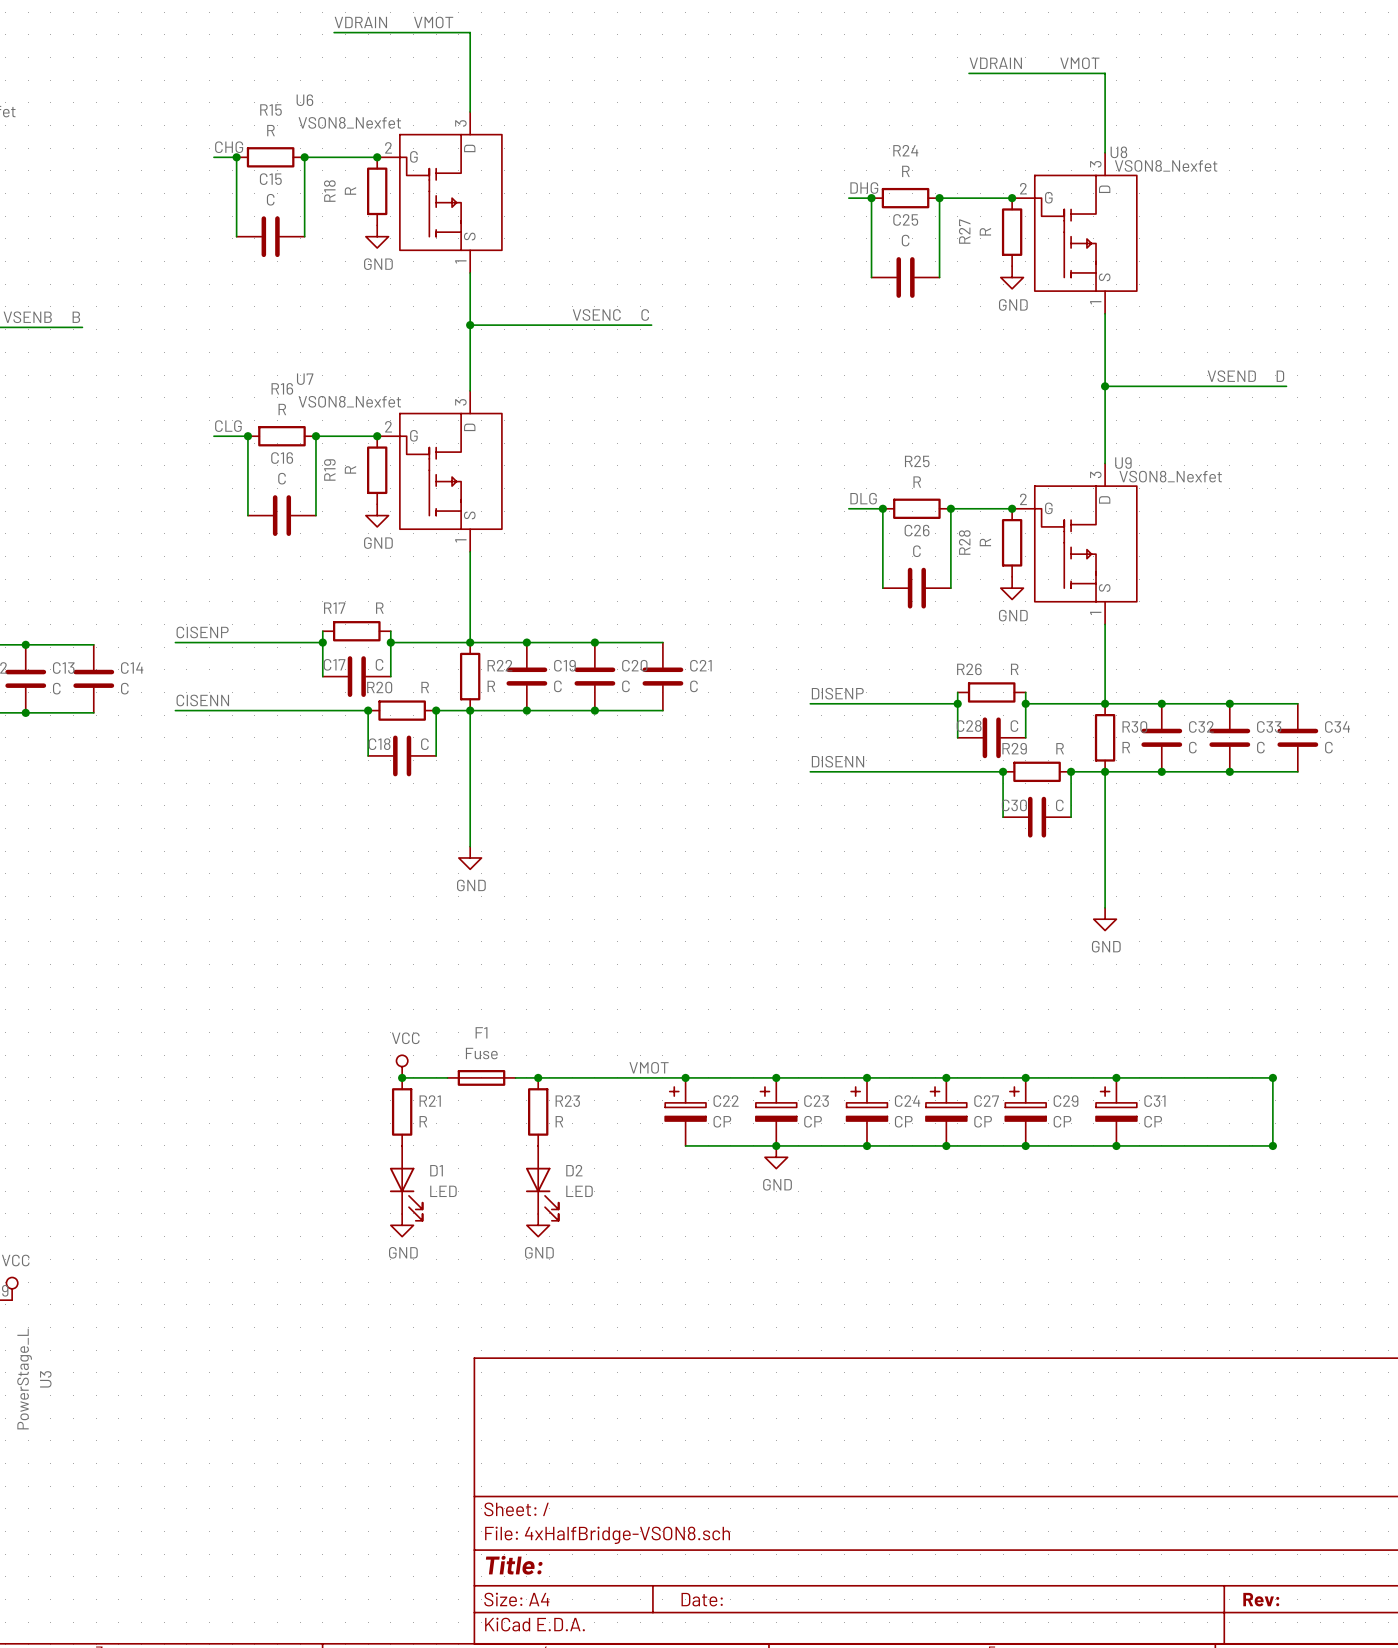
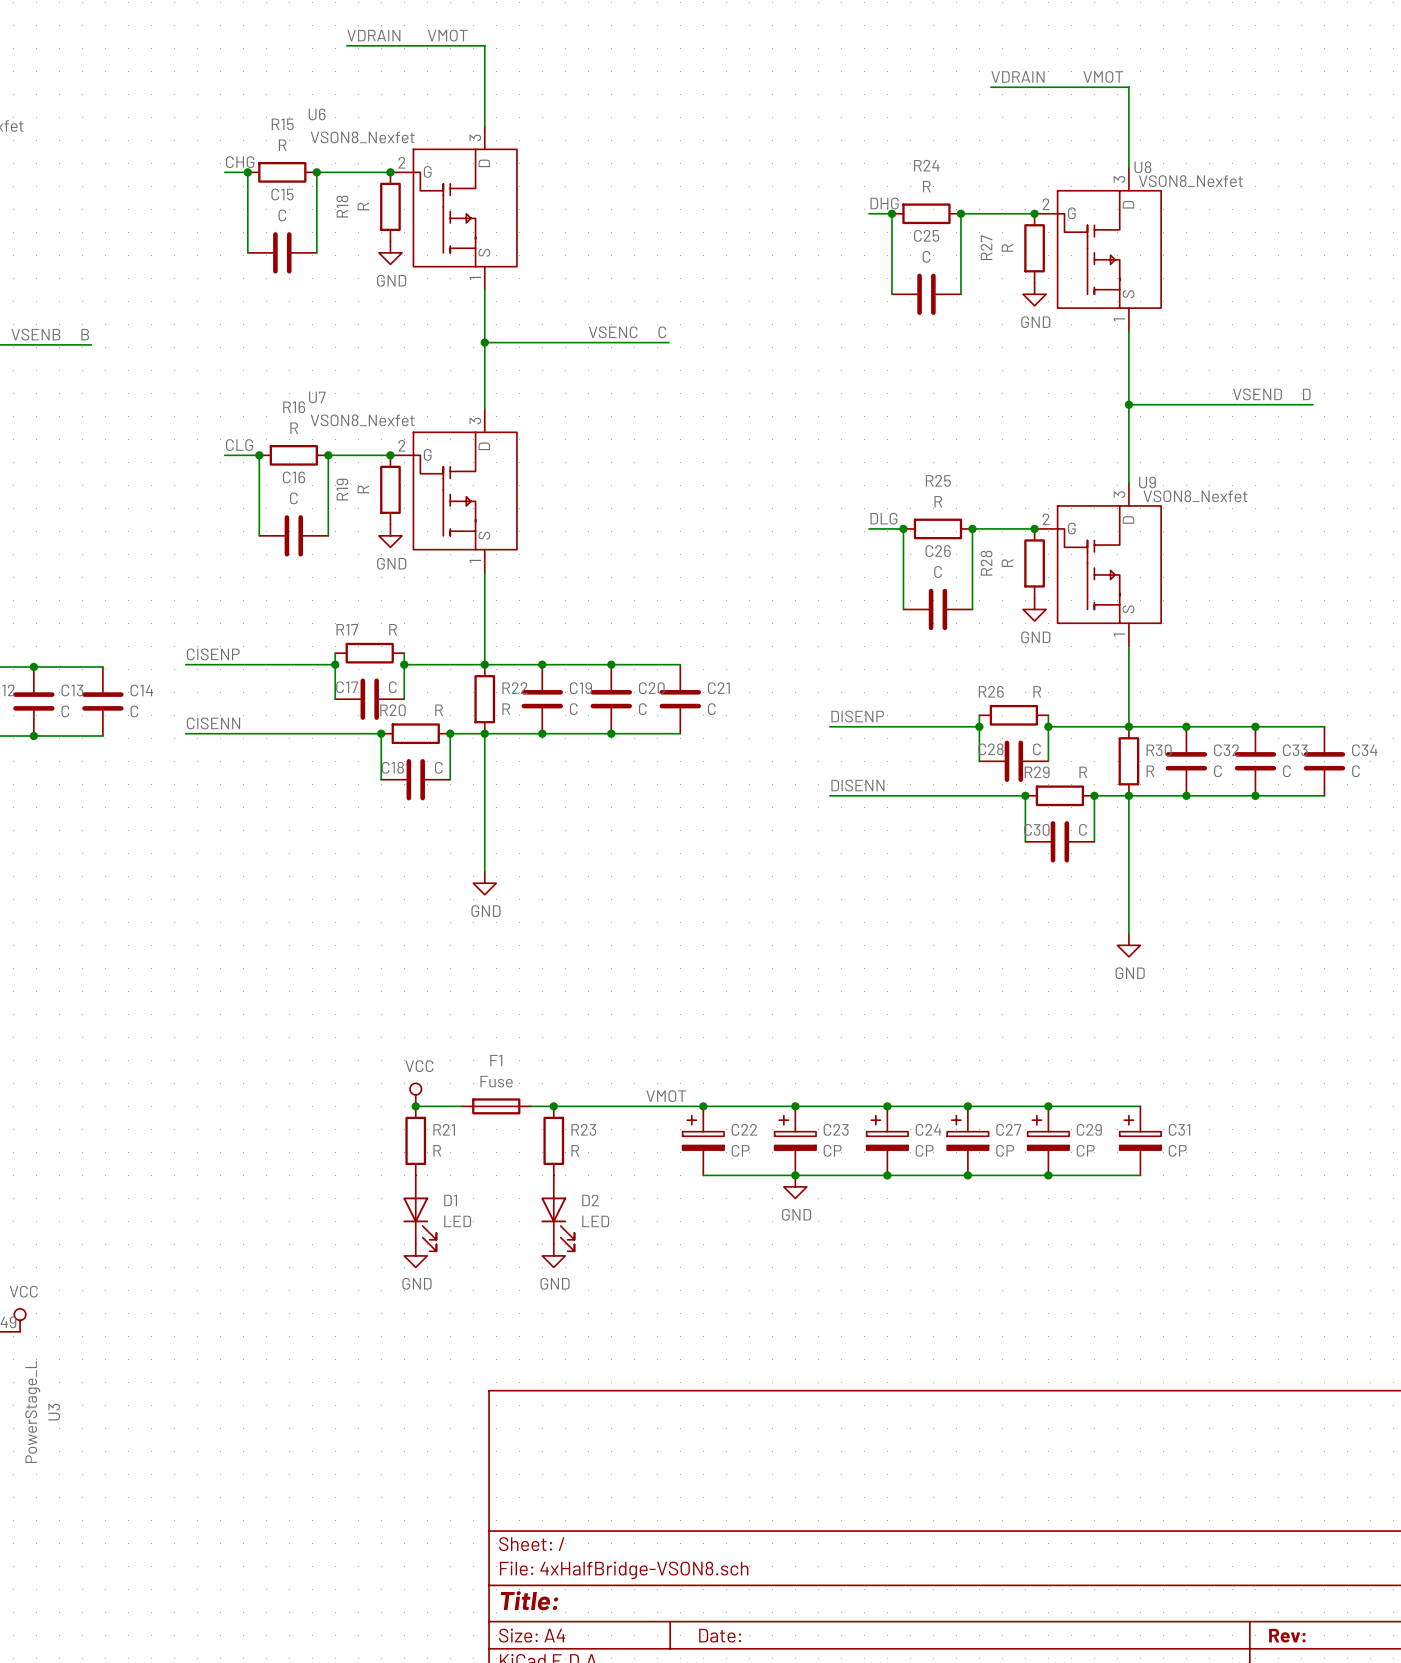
wire: (1116, 1077) (1275, 1077) -> none
junction: (1116, 1077) -> none
wire: (1272, 1077) (1272, 1145) -> none
junction: (1272, 1077) -> none
wire: (1116, 1145) (1275, 1145) -> none
junction: (1116, 1145) -> none
junction: (1272, 1145) -> none

